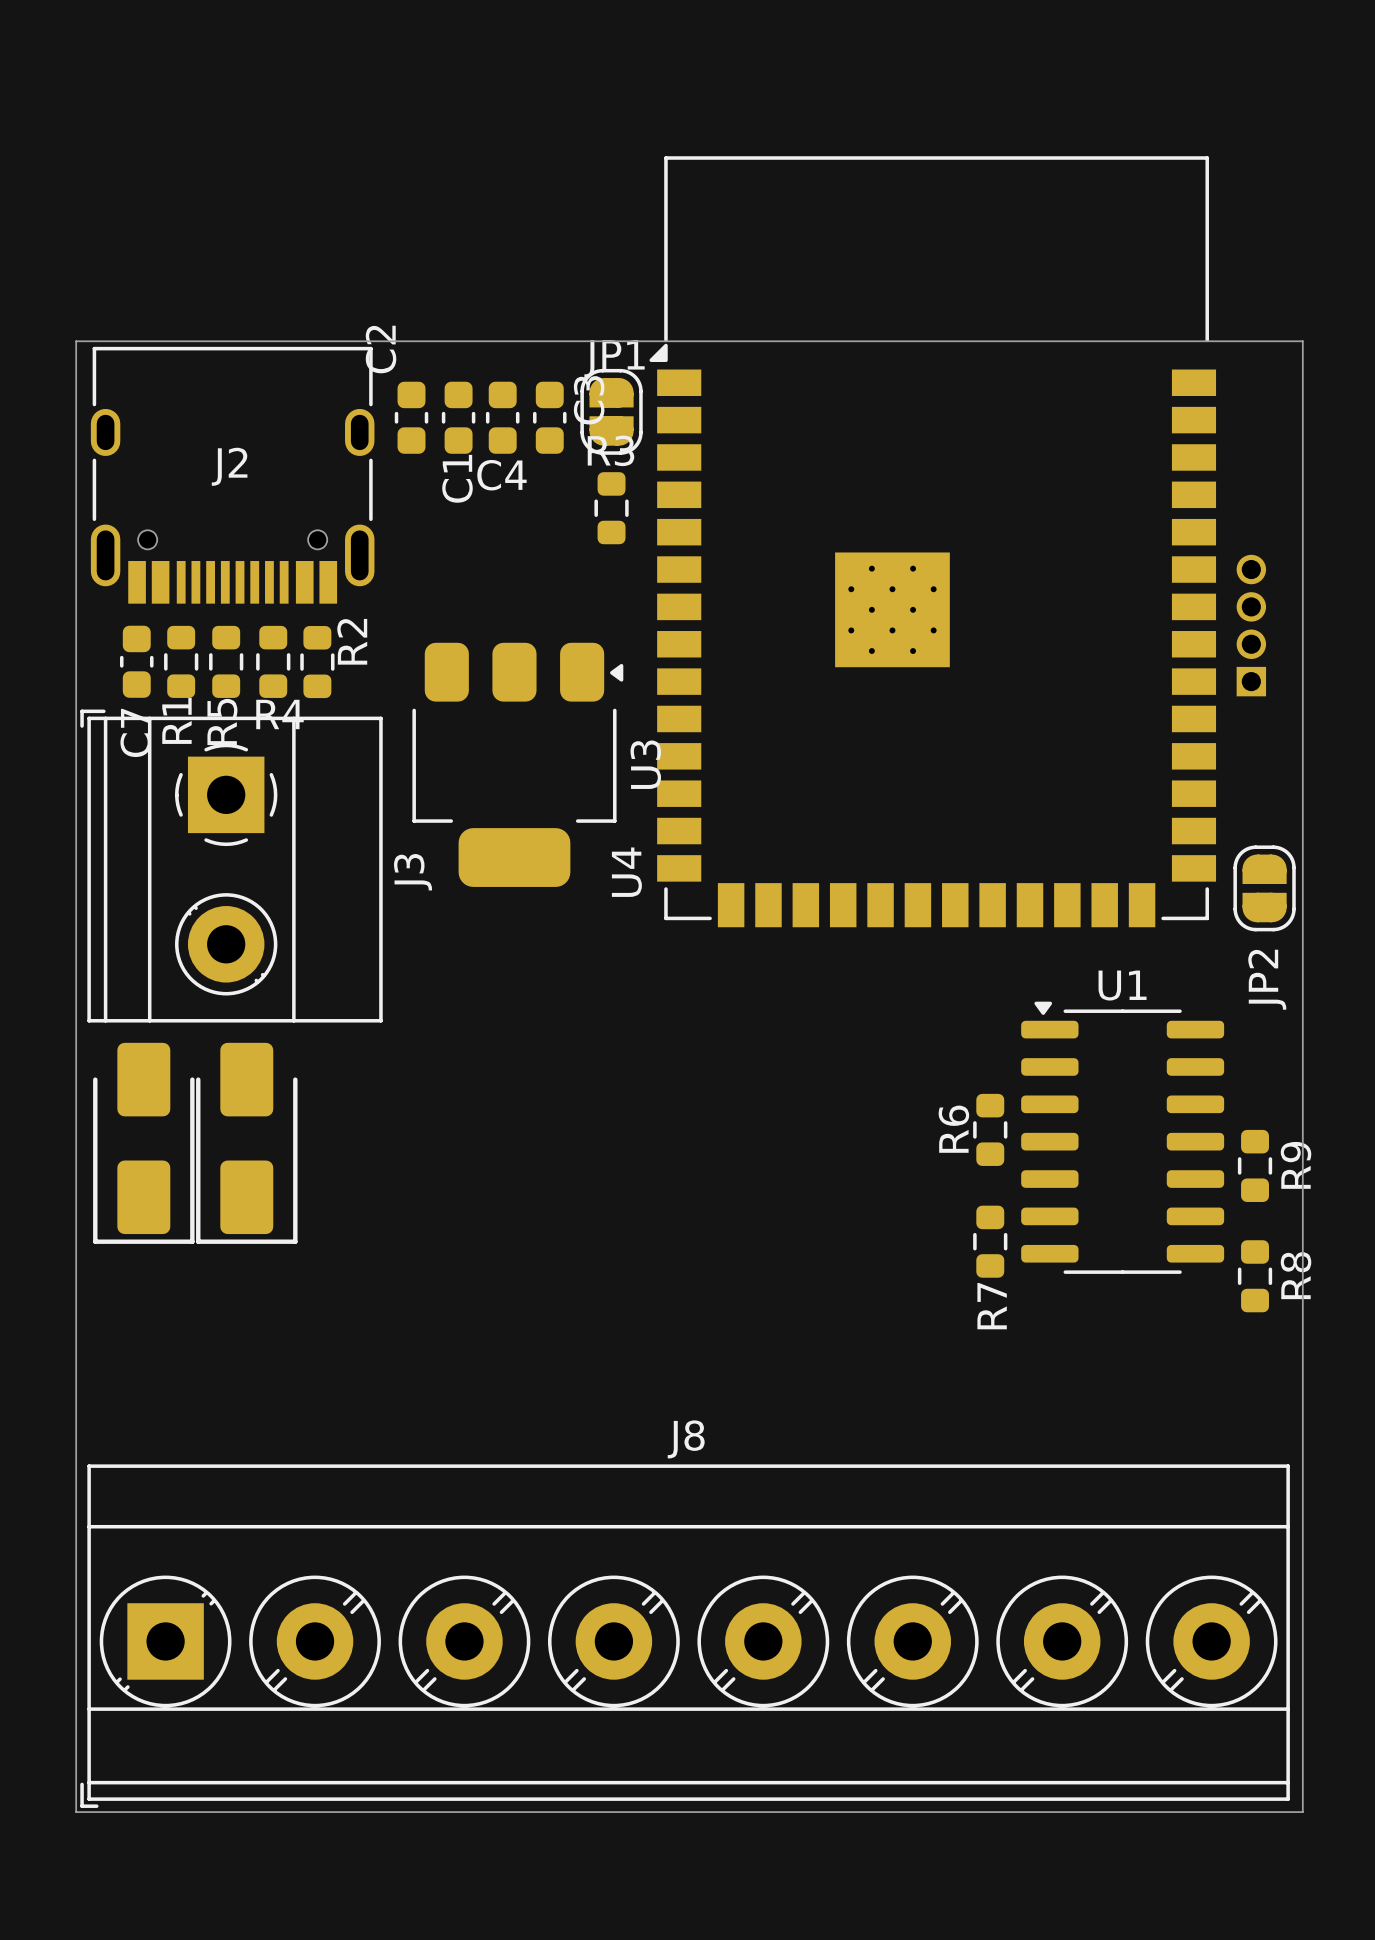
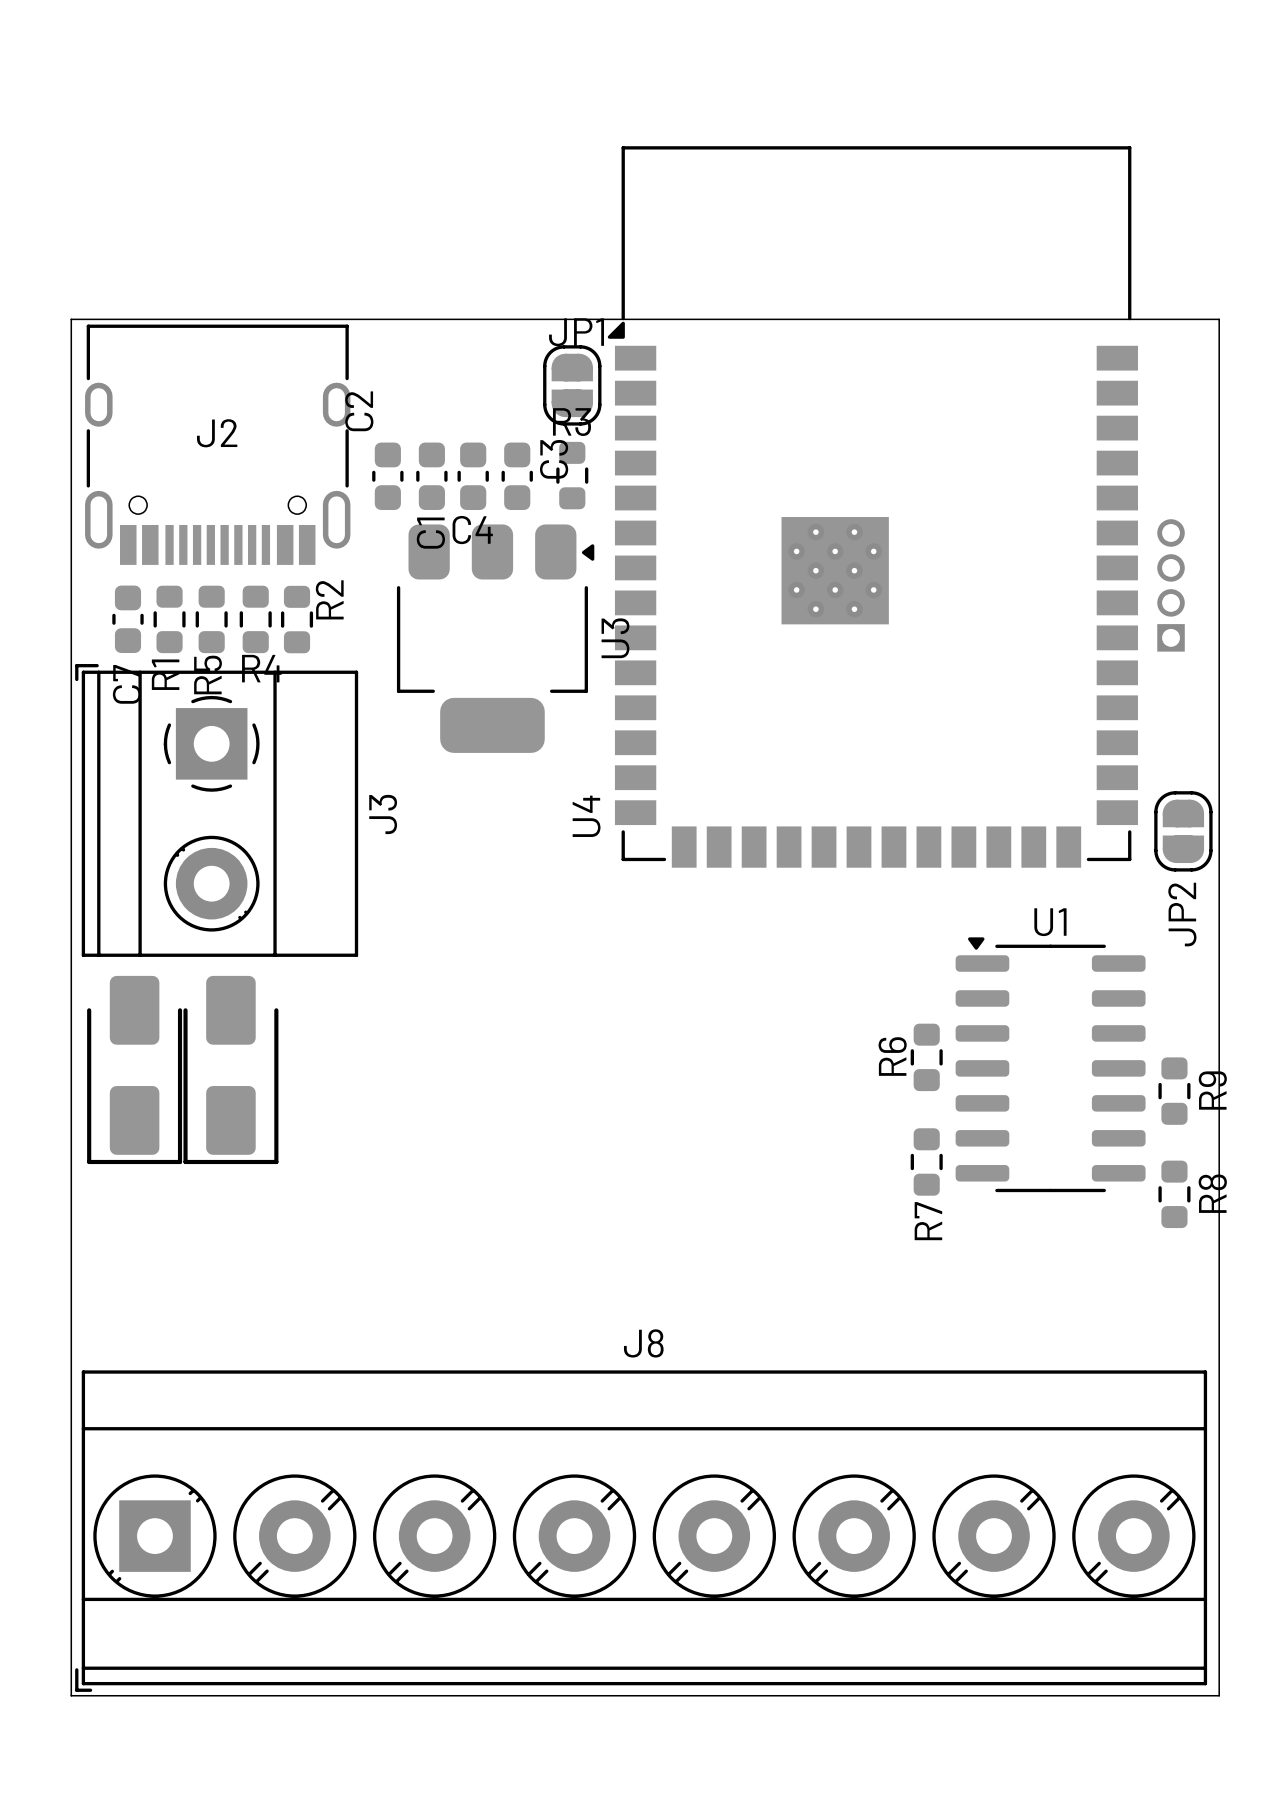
C2 position: (411, 417) -> (387, 476)
C1 position: (458, 417) -> (431, 476)
C4 position: (502, 417) -> (473, 476)
C3 position: (549, 417) -> (517, 476)
U3 position: (517, 764) -> (495, 638)

